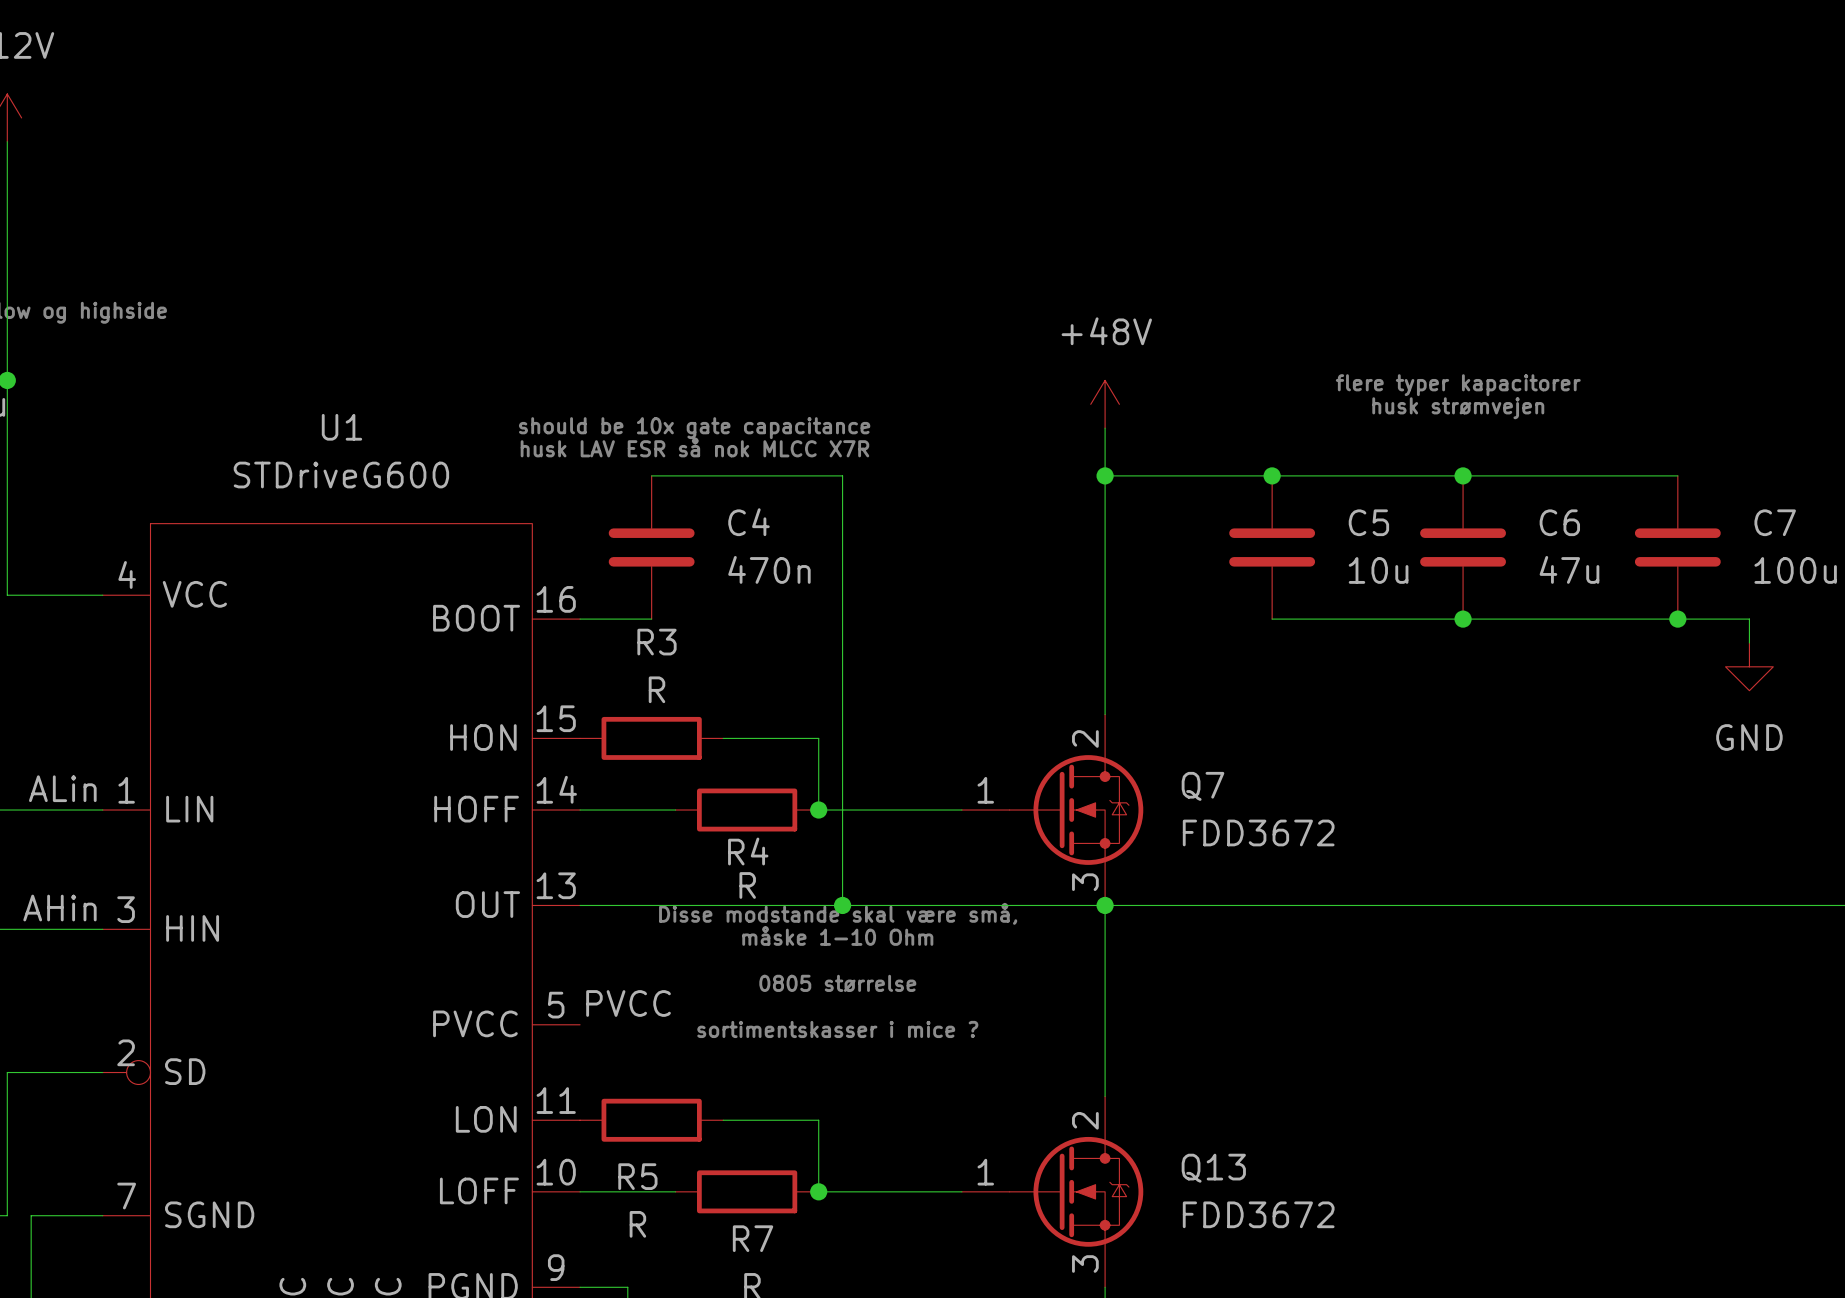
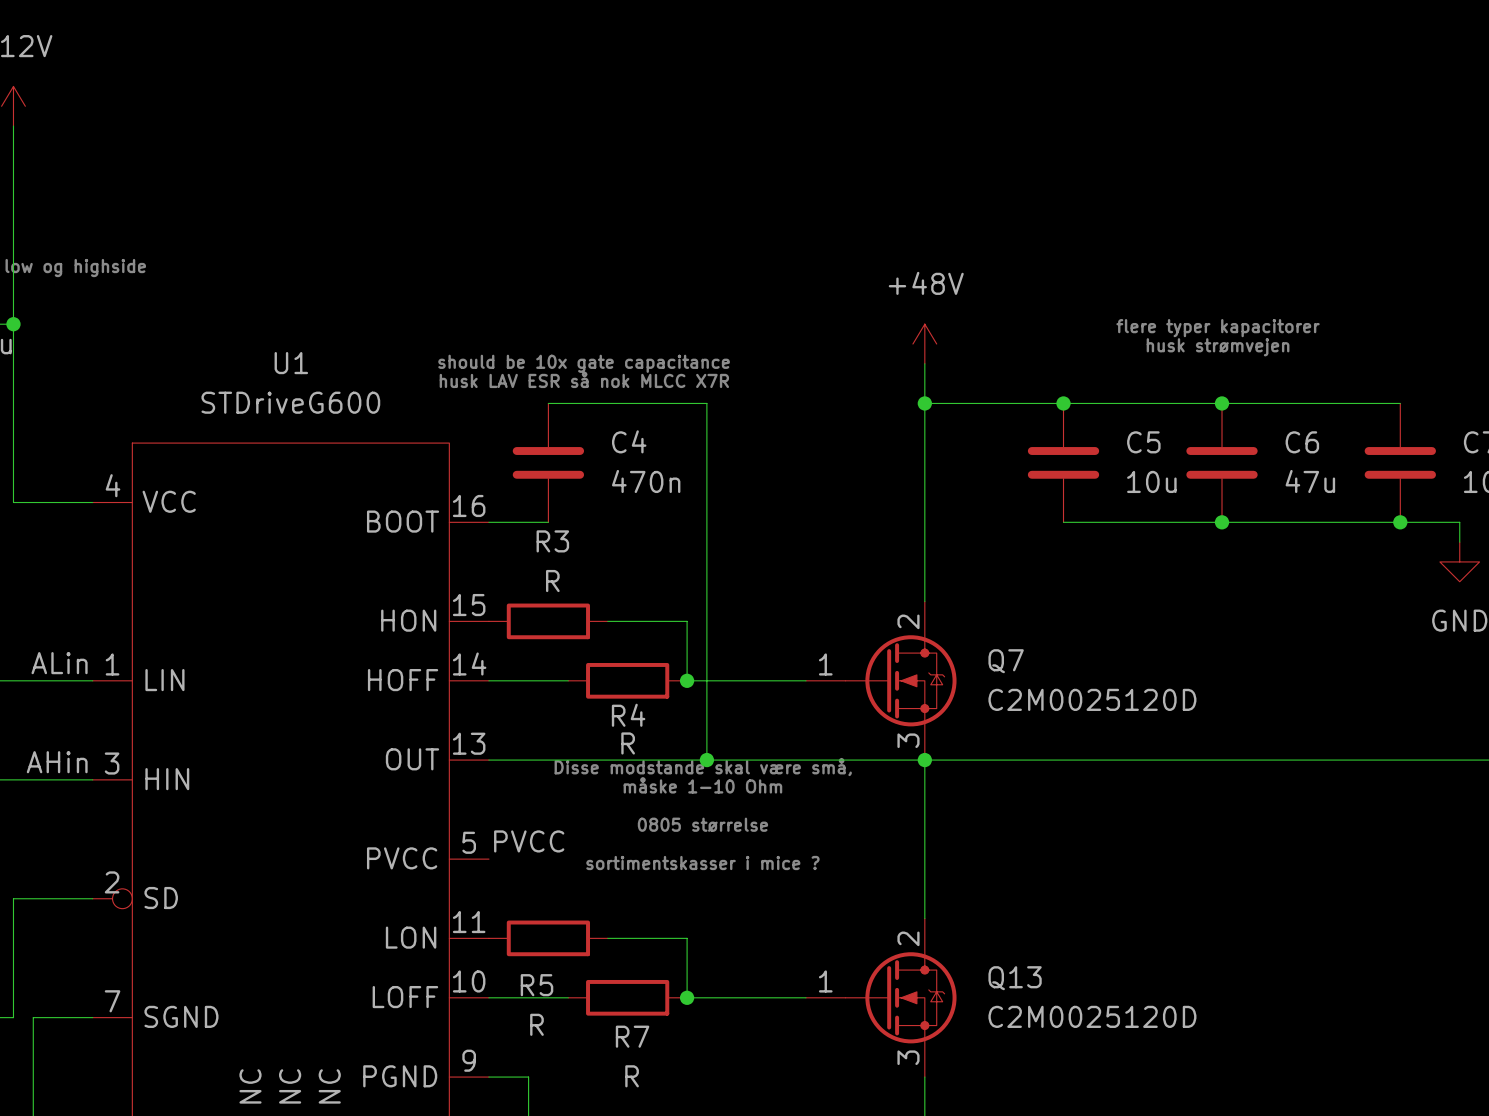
Q7 value: FDD3672 (1258, 832) -> C2M0025120D (1092, 699)
Q13 value: FDD3672 (1258, 1214) -> C2M0025120D (1092, 1016)

